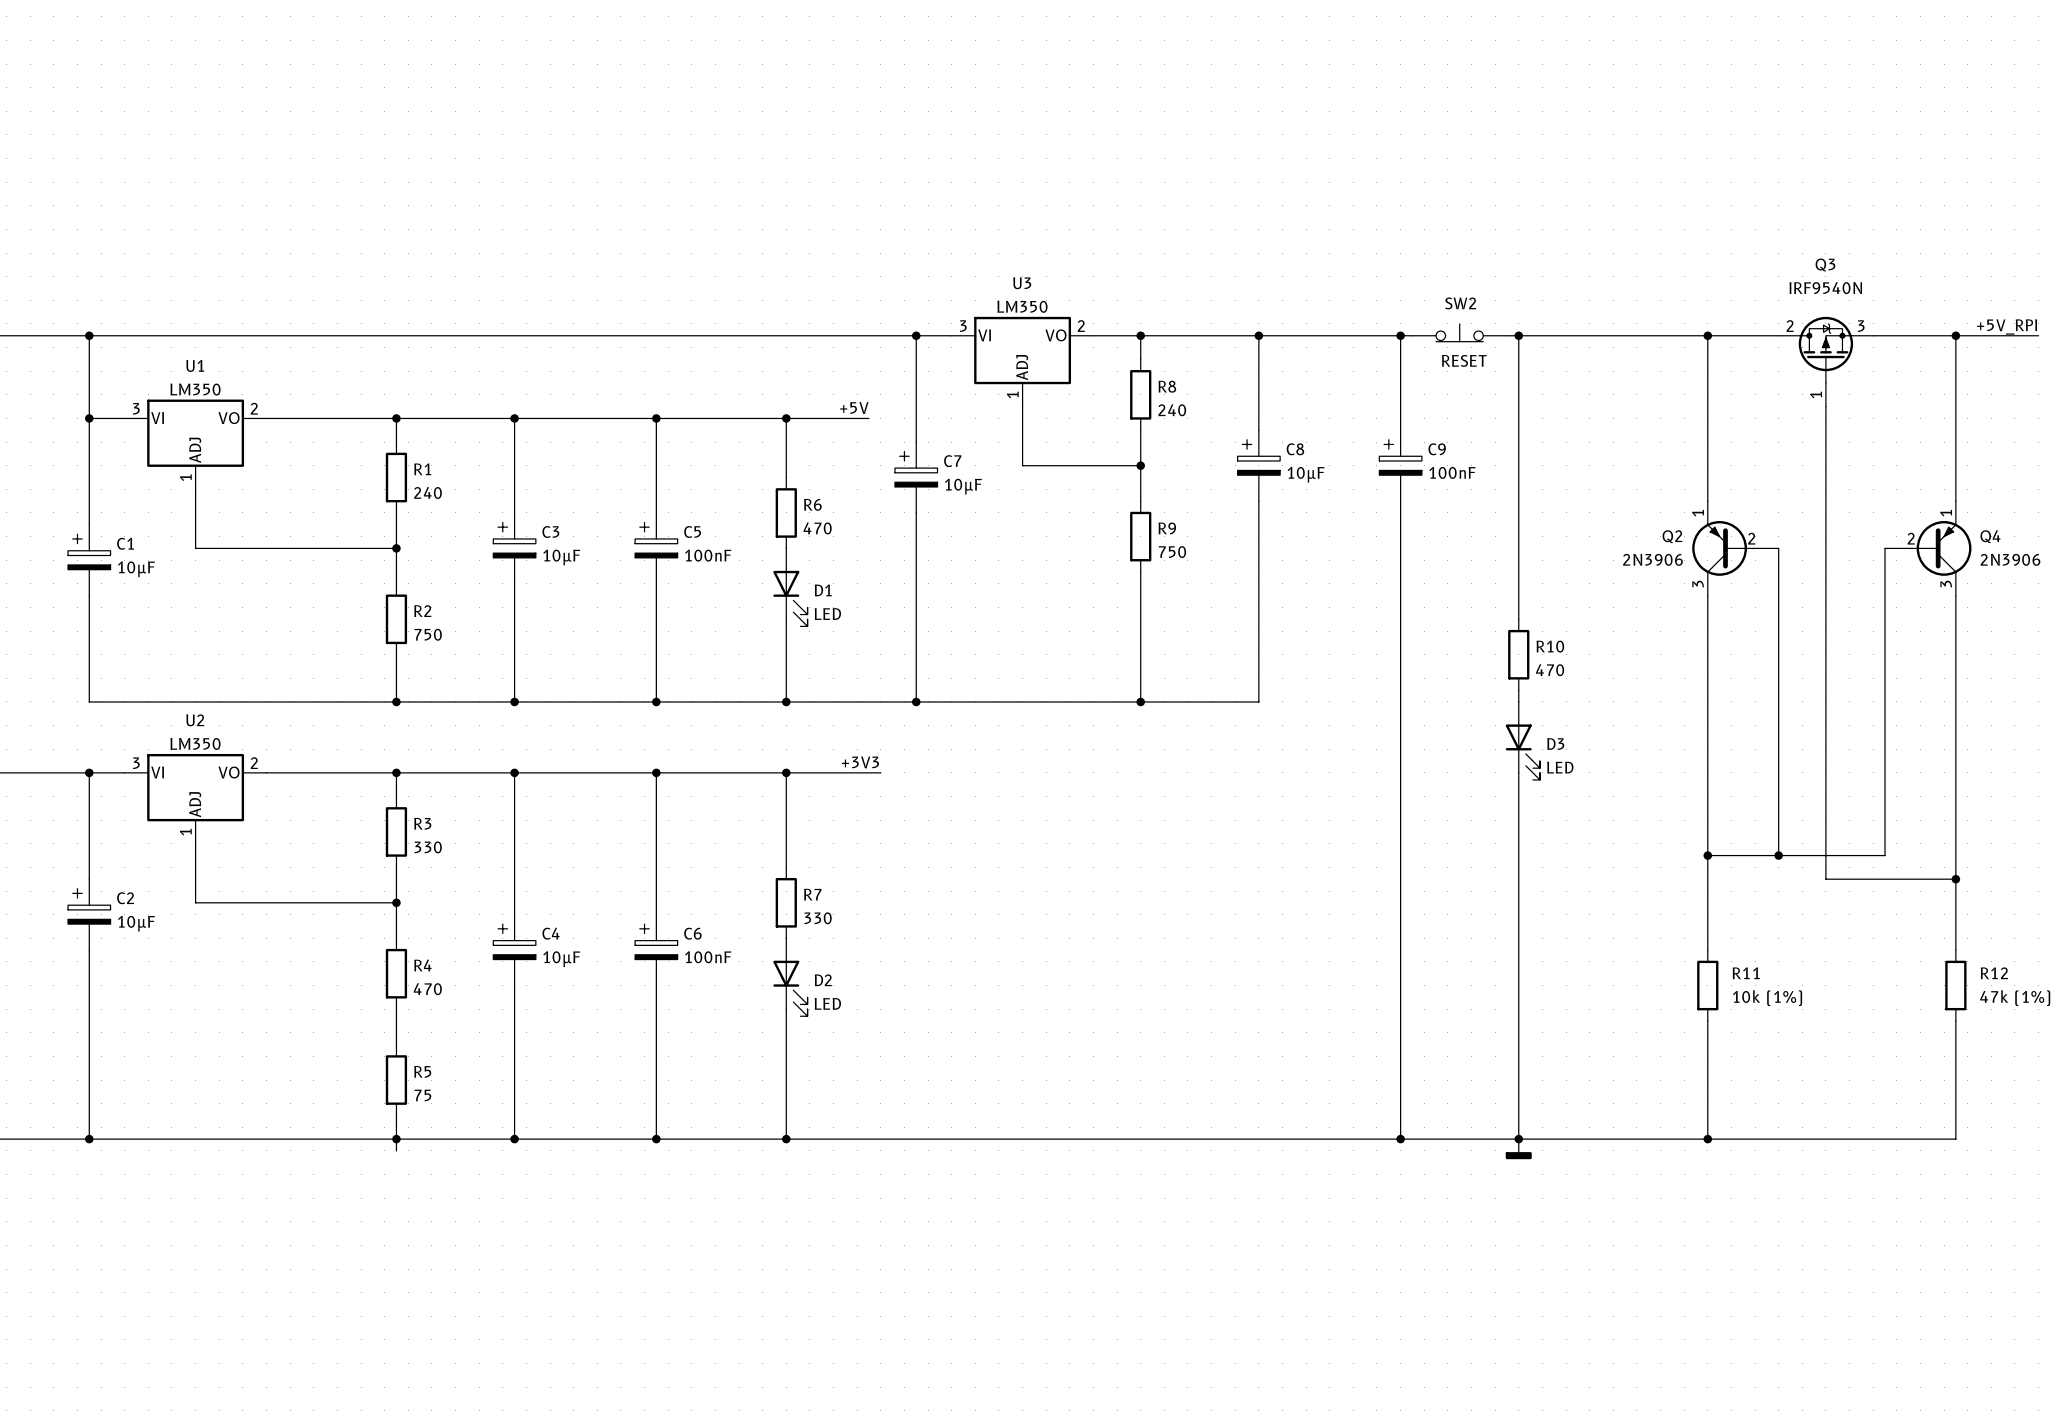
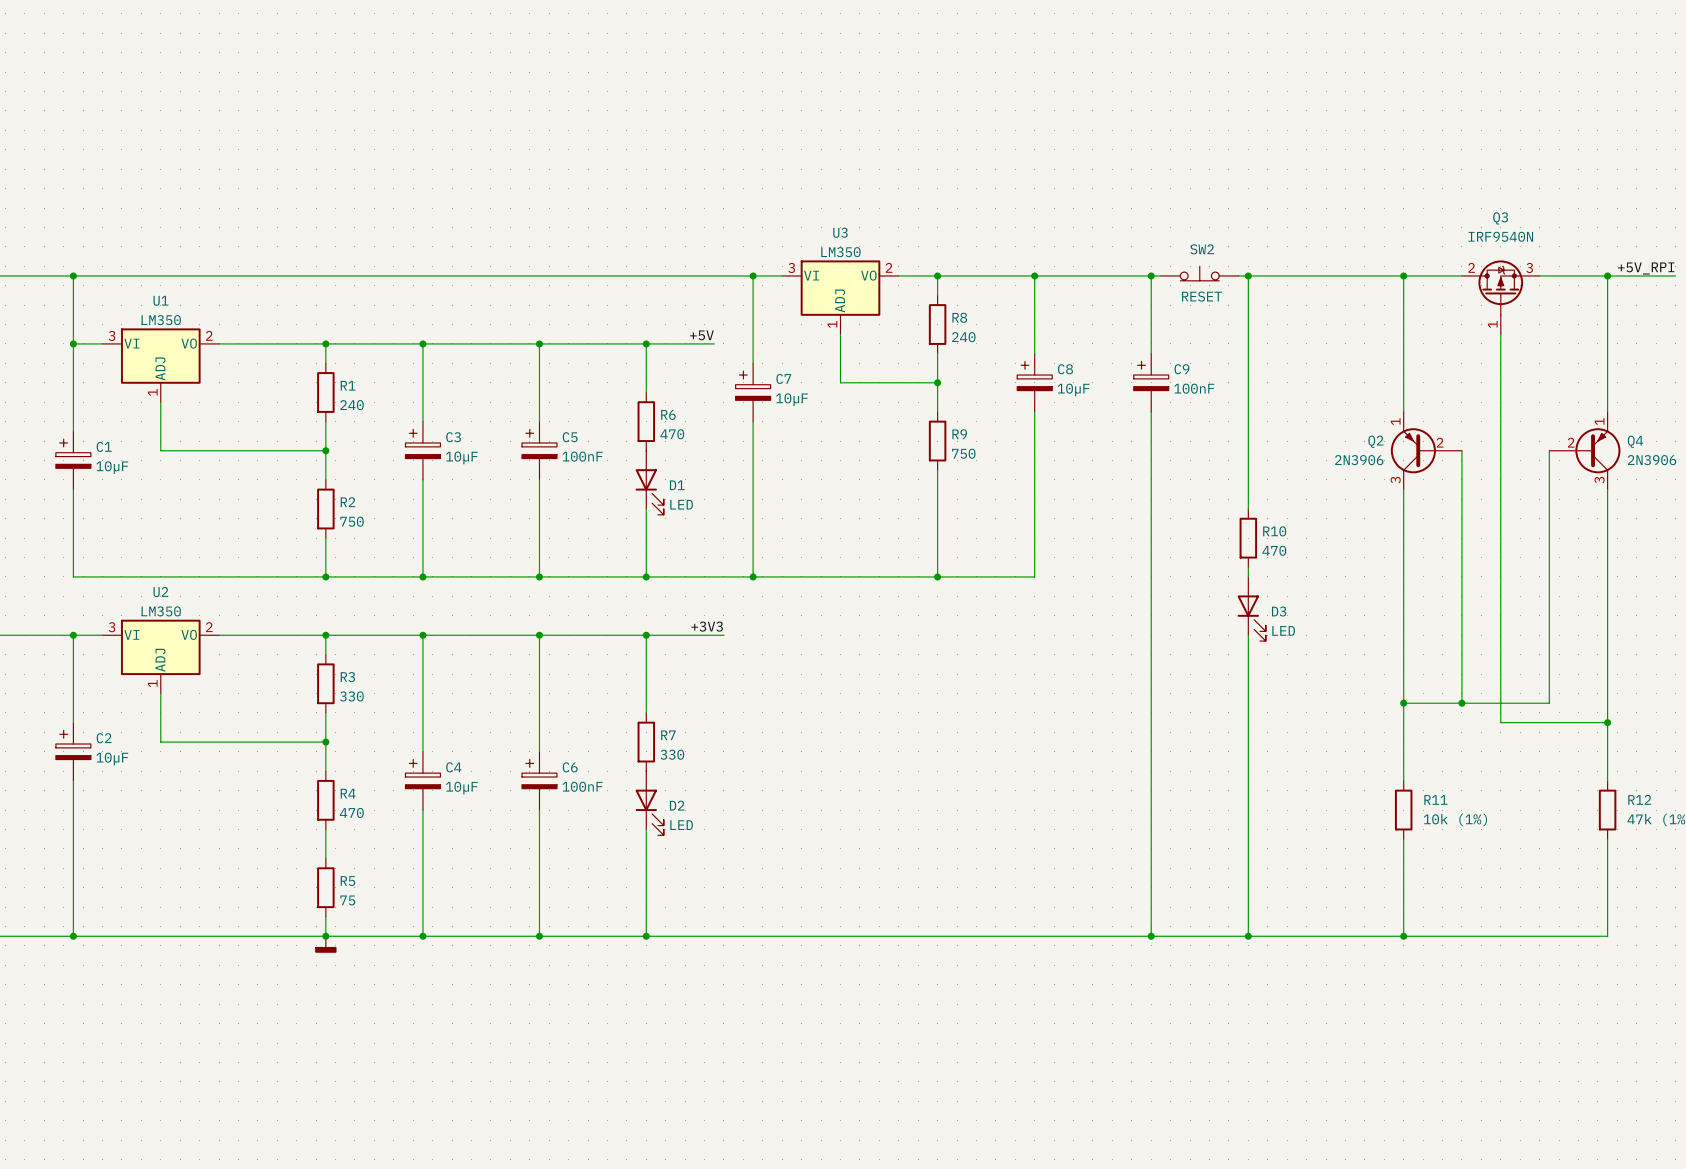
power symbol: none -> (325, 944)
power symbol: (1518, 1149) -> none

